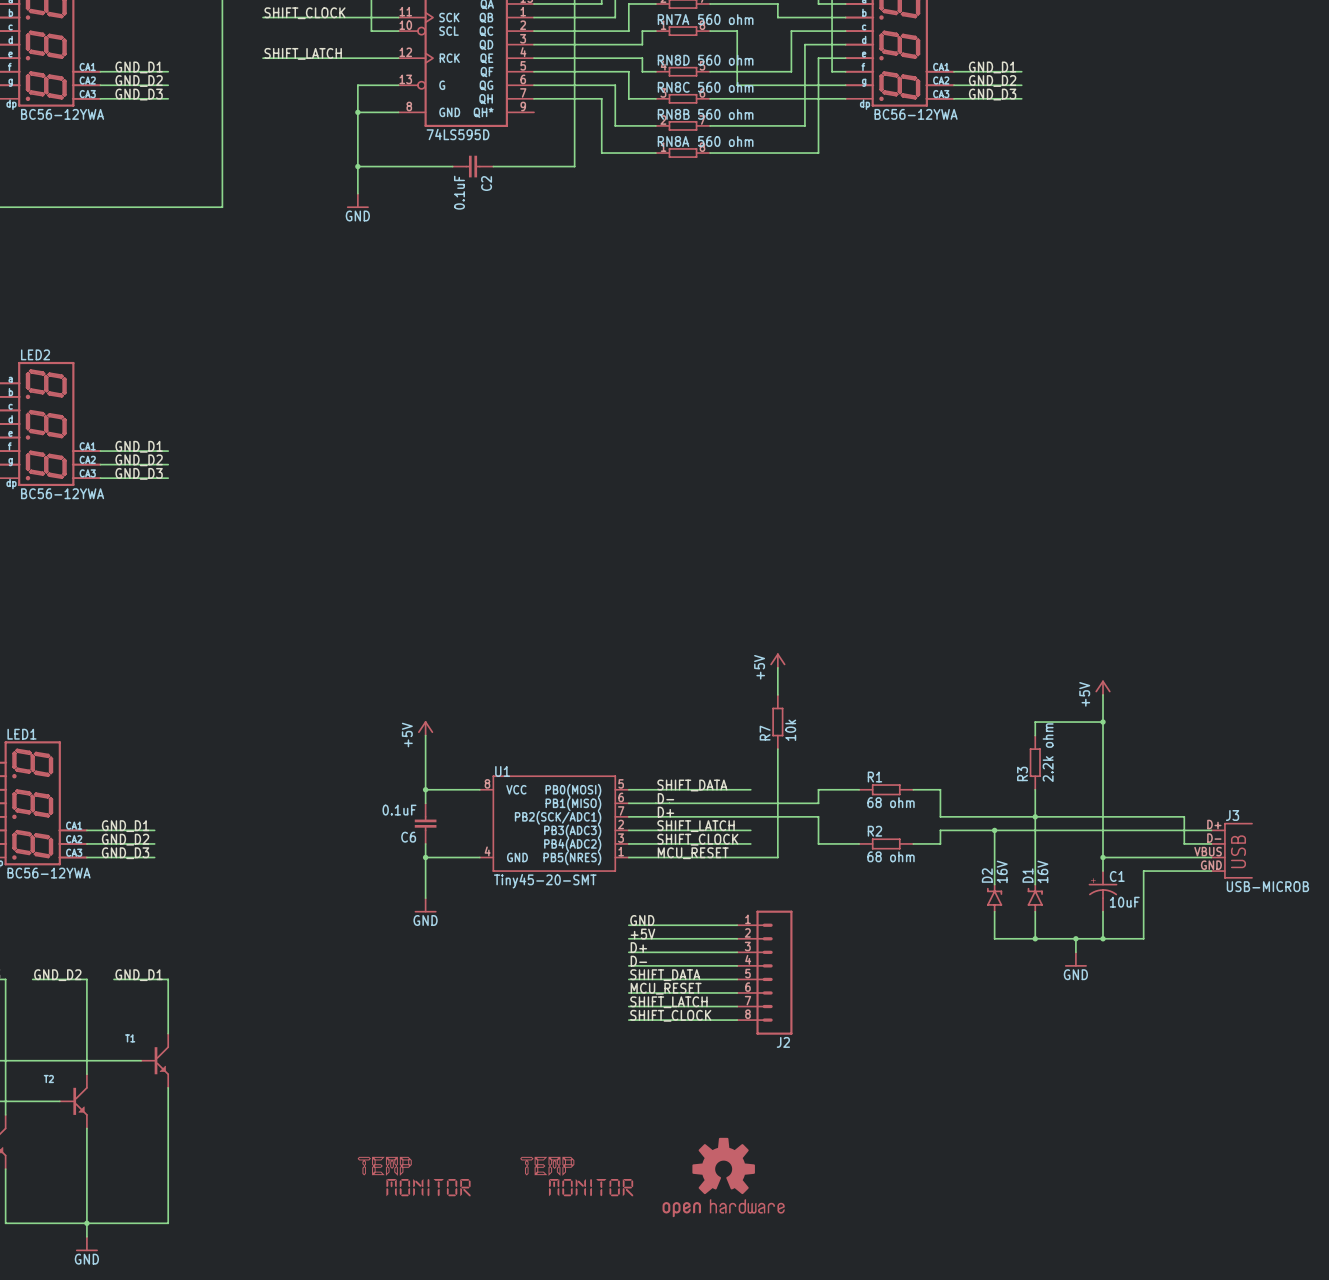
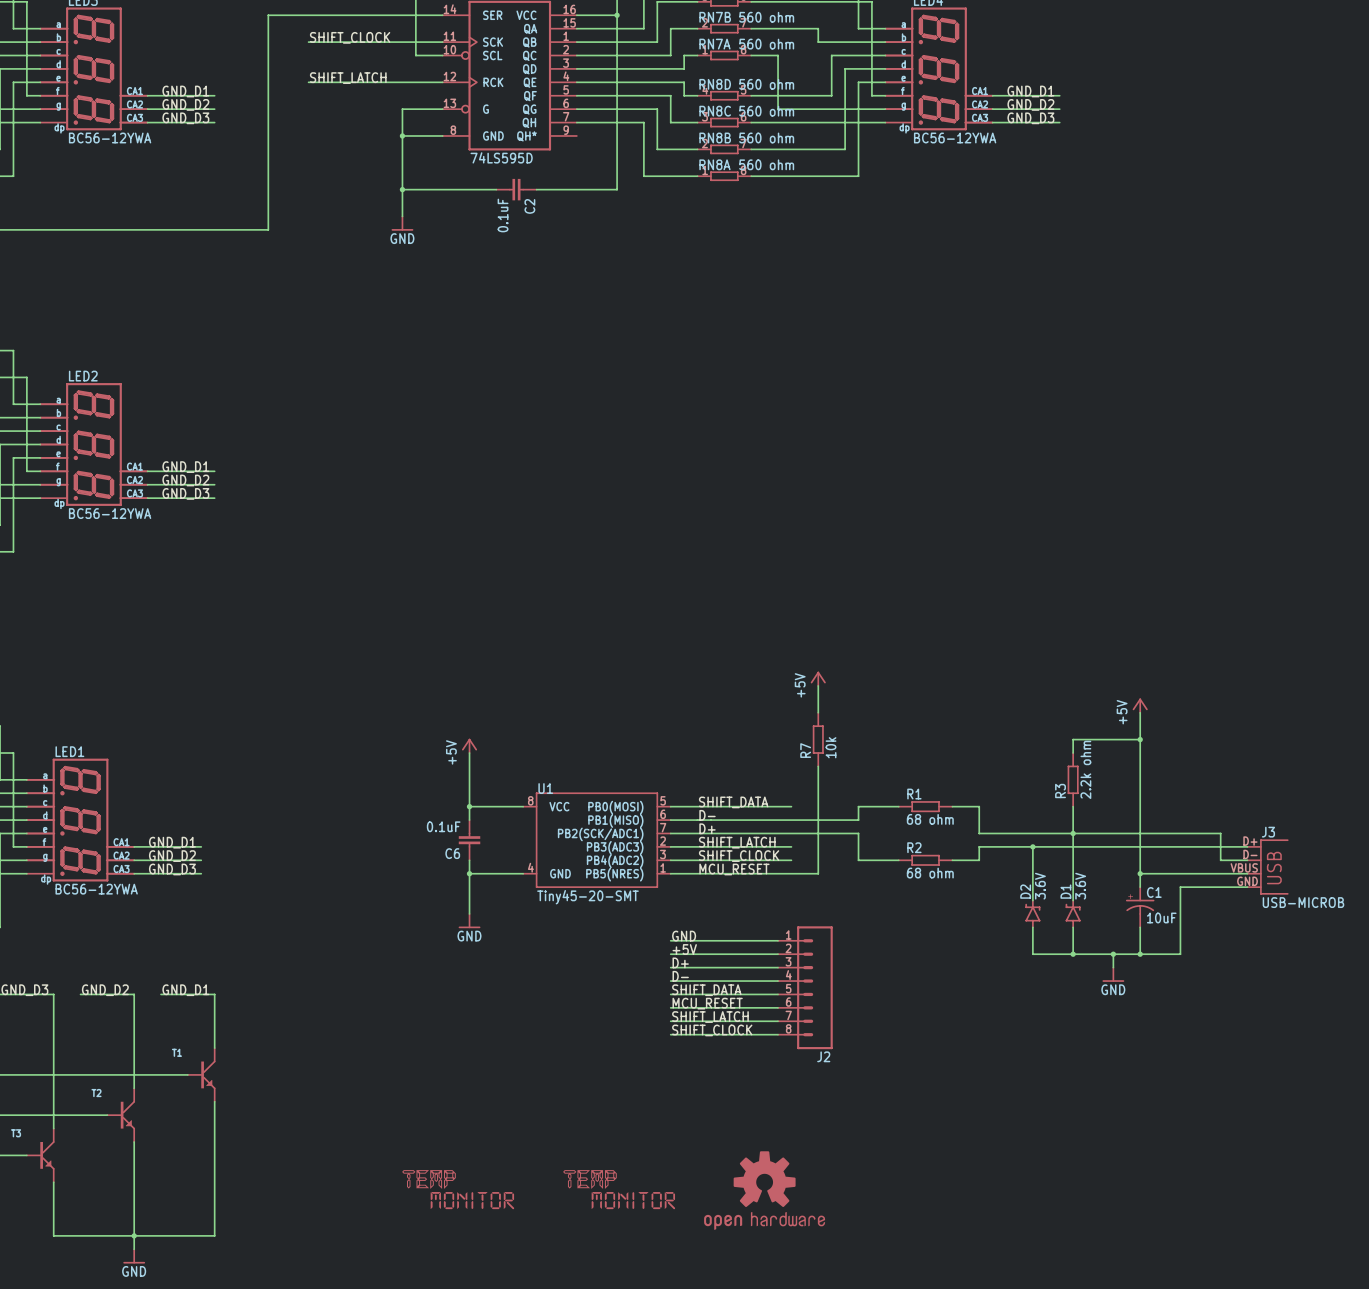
D2 value: 16V (1002, 871) -> 3.6V (1040, 886)
D1 value: 16V (1042, 871) -> 3.6V (1080, 886)

